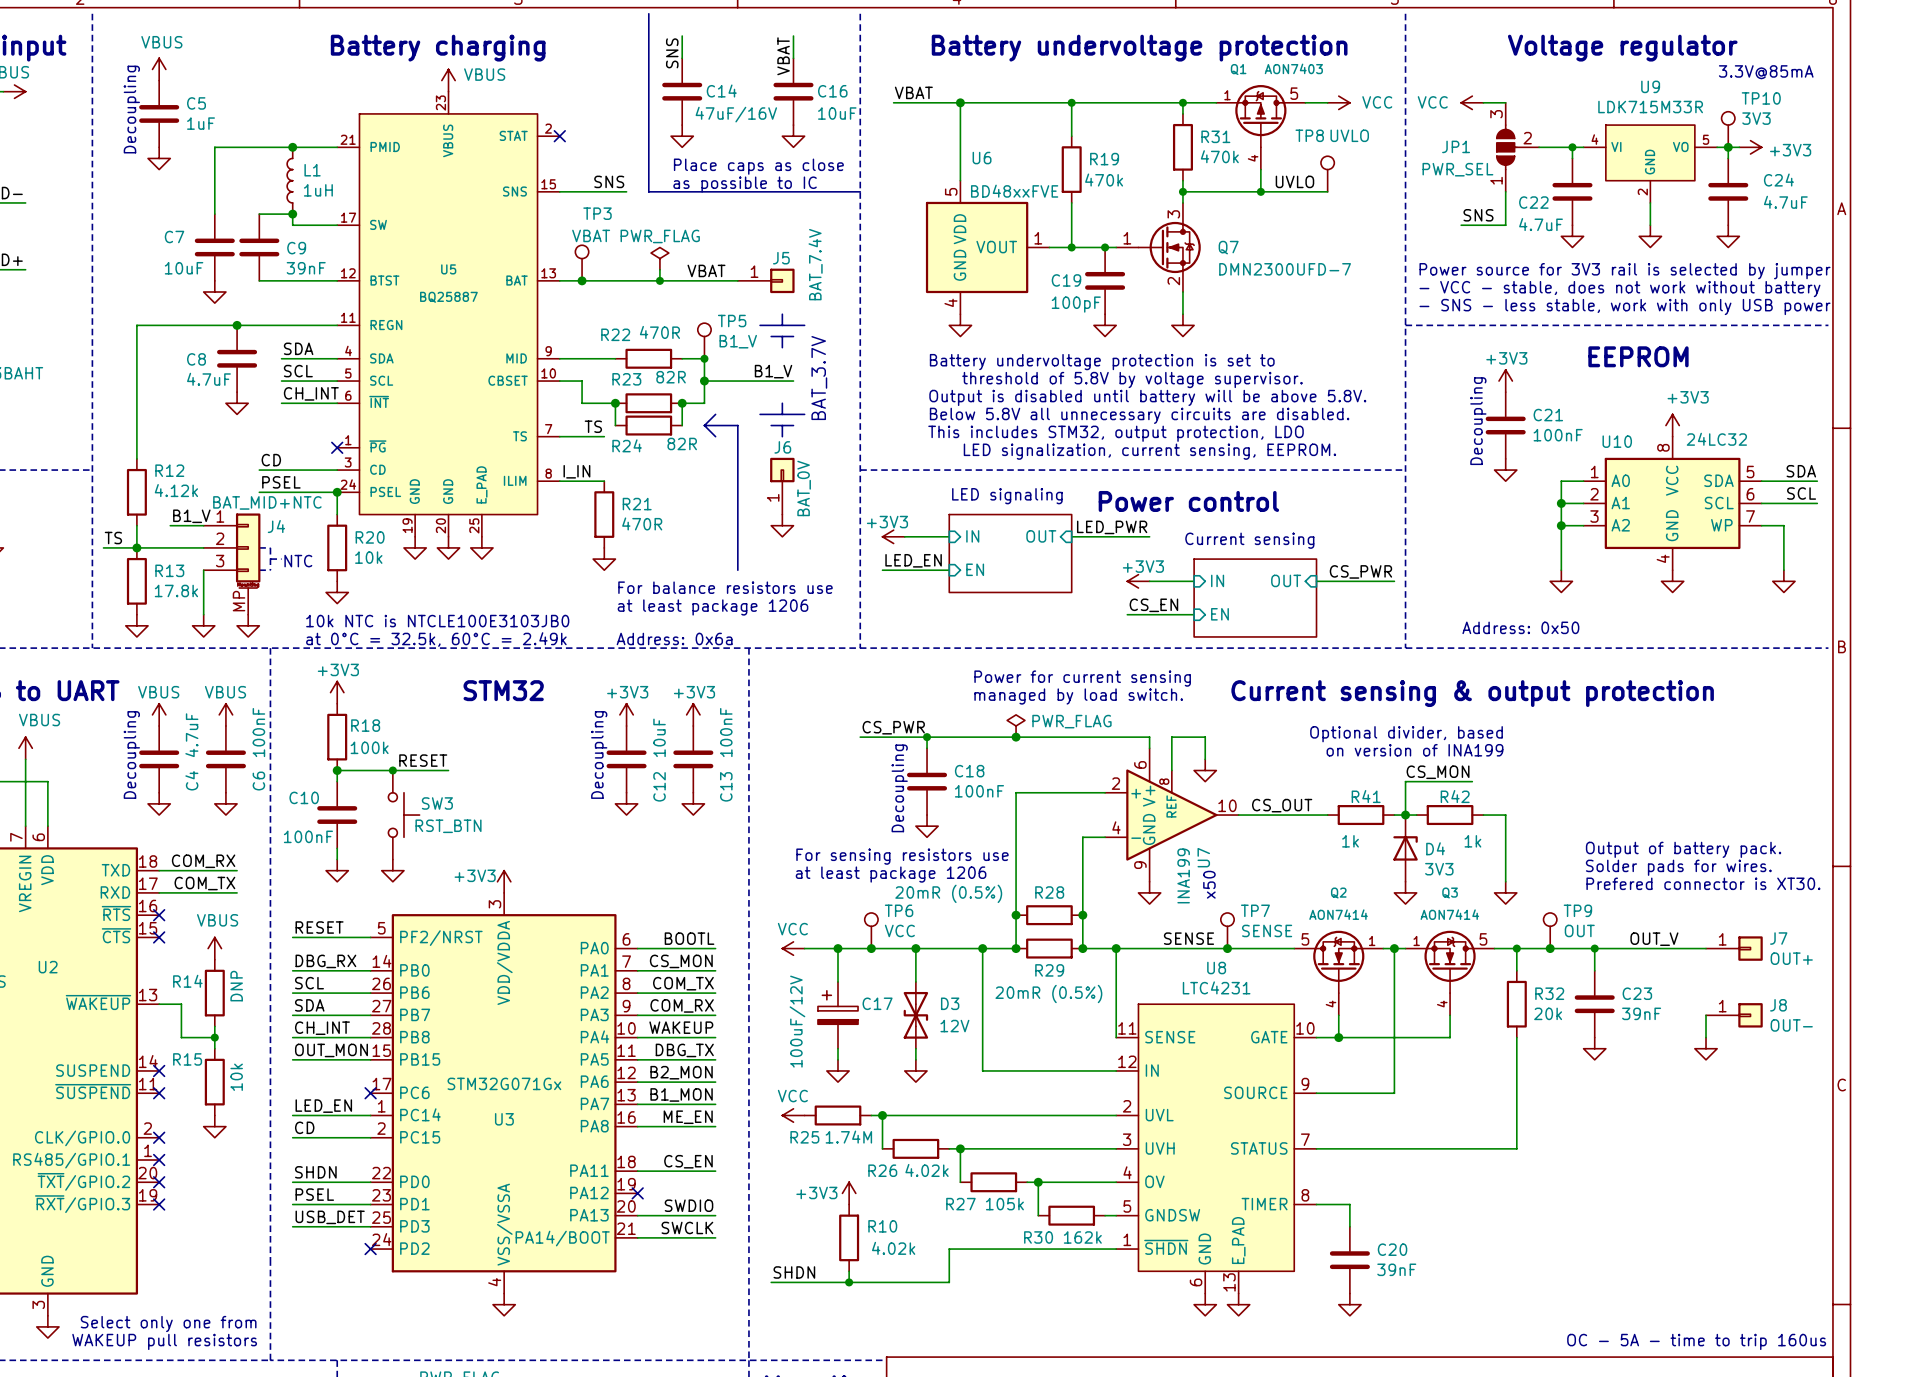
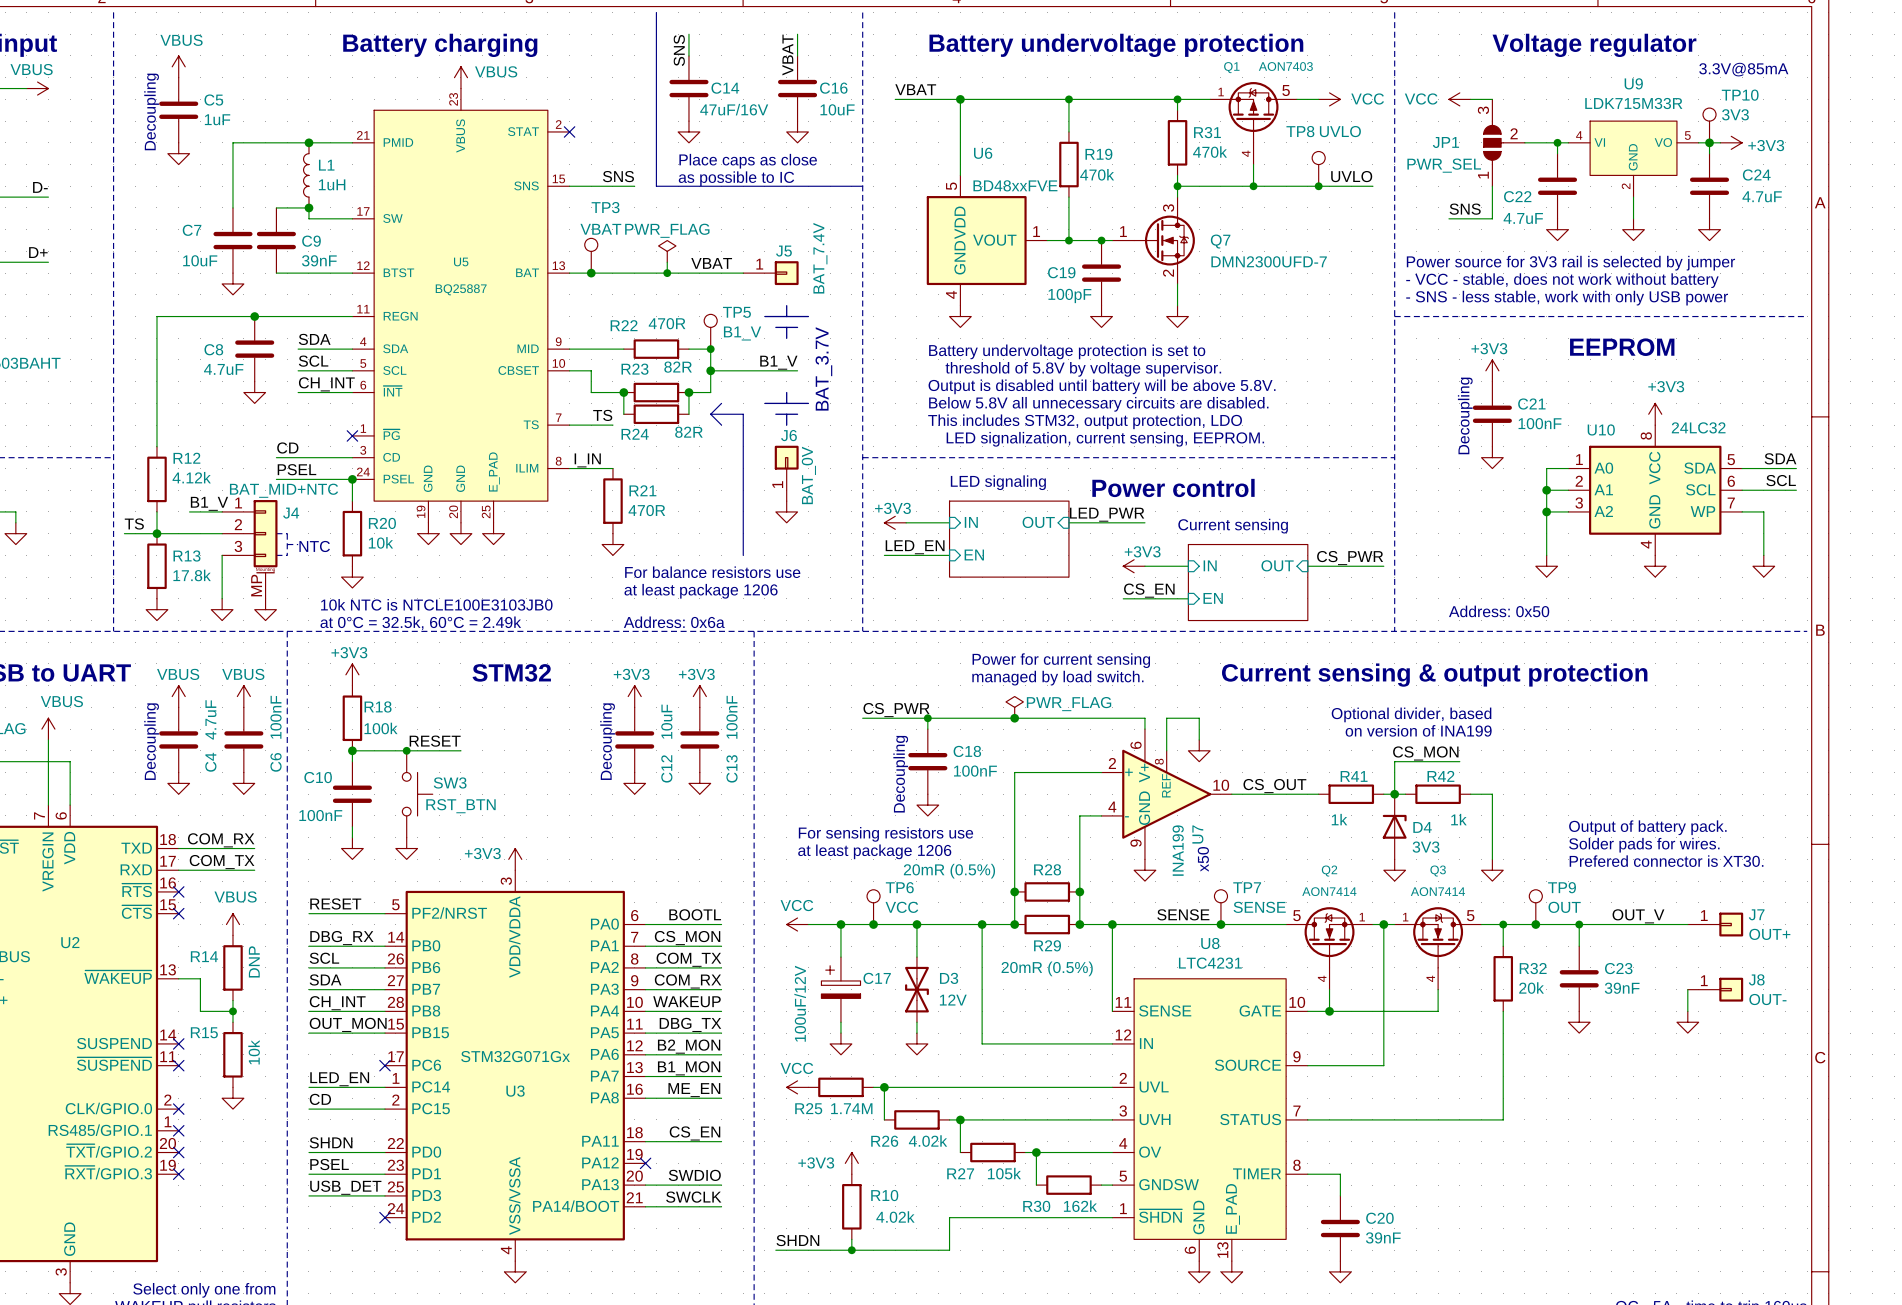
label position: UVLO (1294, 181) -> UVLO (1351, 176)
wire: none -> (1318, 186) (1372, 186)
junction: none -> (1318, 186)

